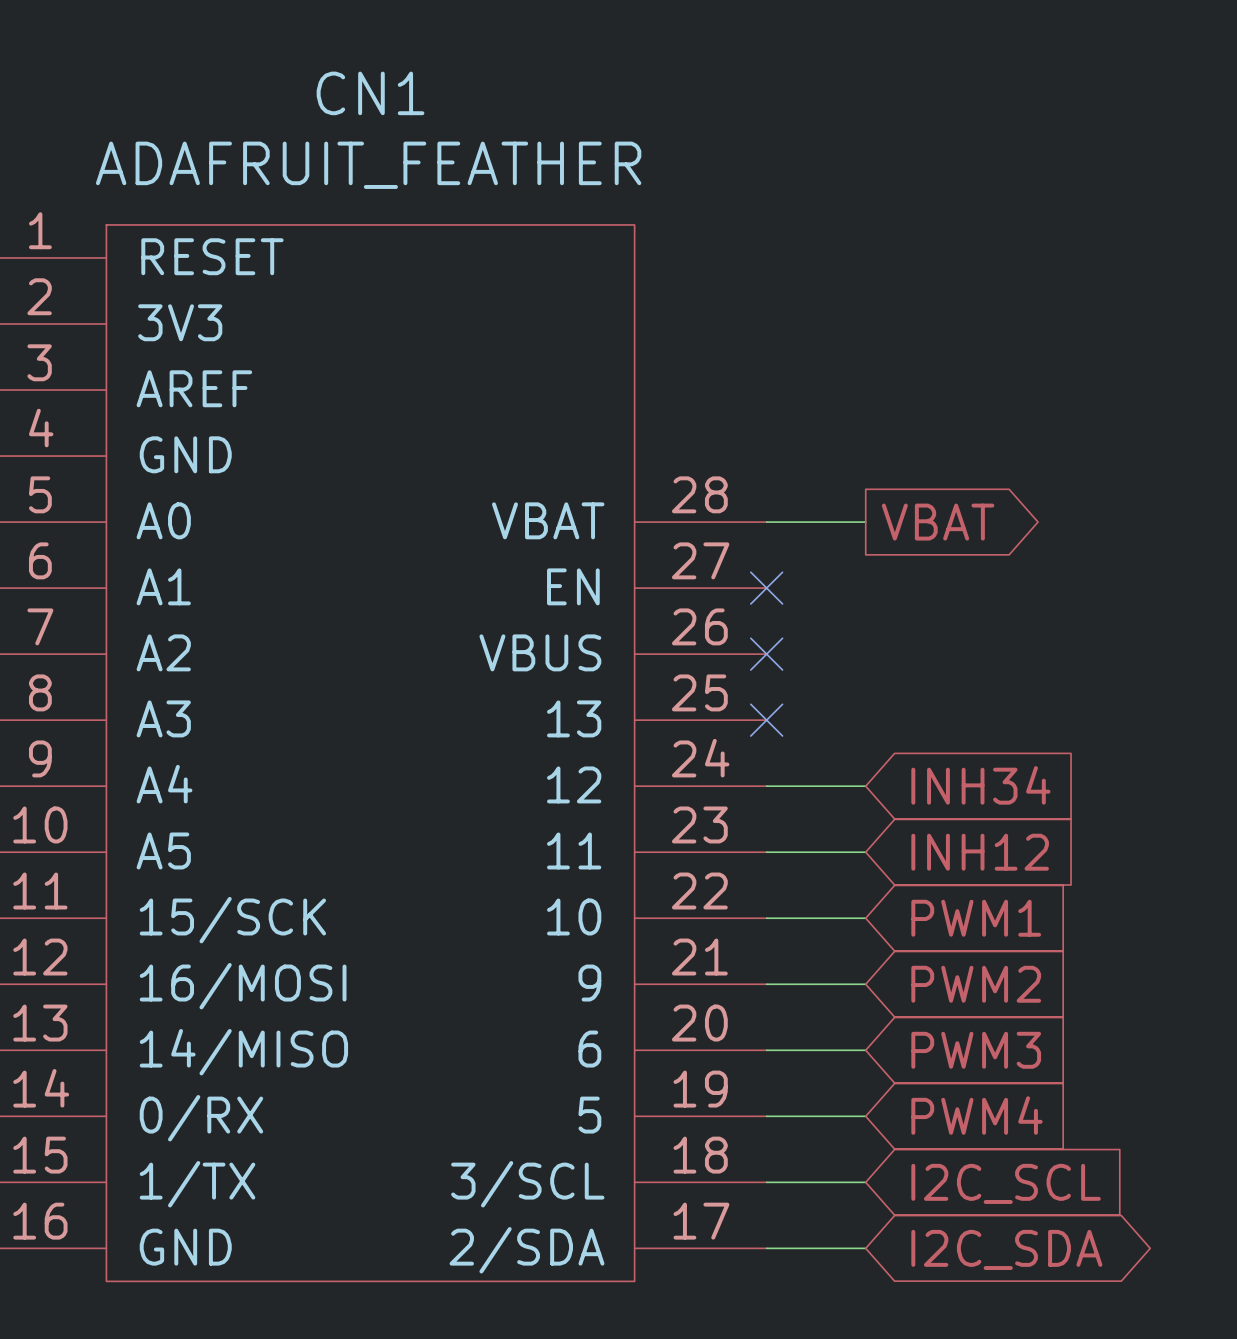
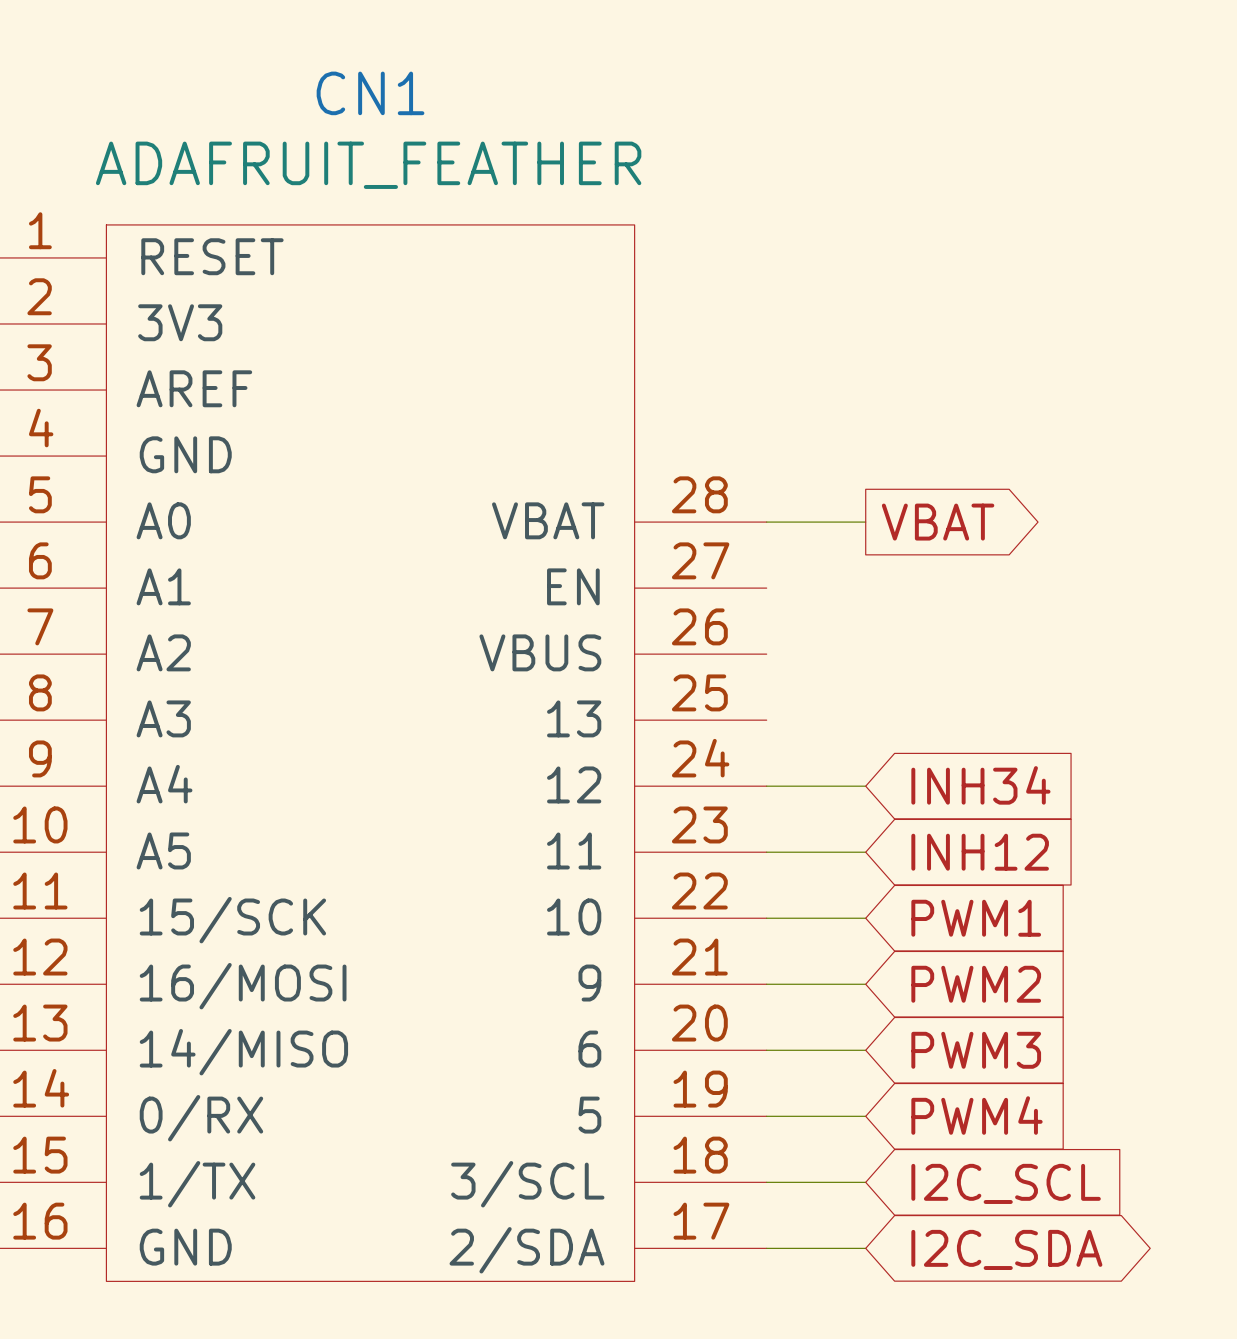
no-connect mark: (766, 588) -> none
no-connect mark: (766, 654) -> none
no-connect mark: (766, 720) -> none

